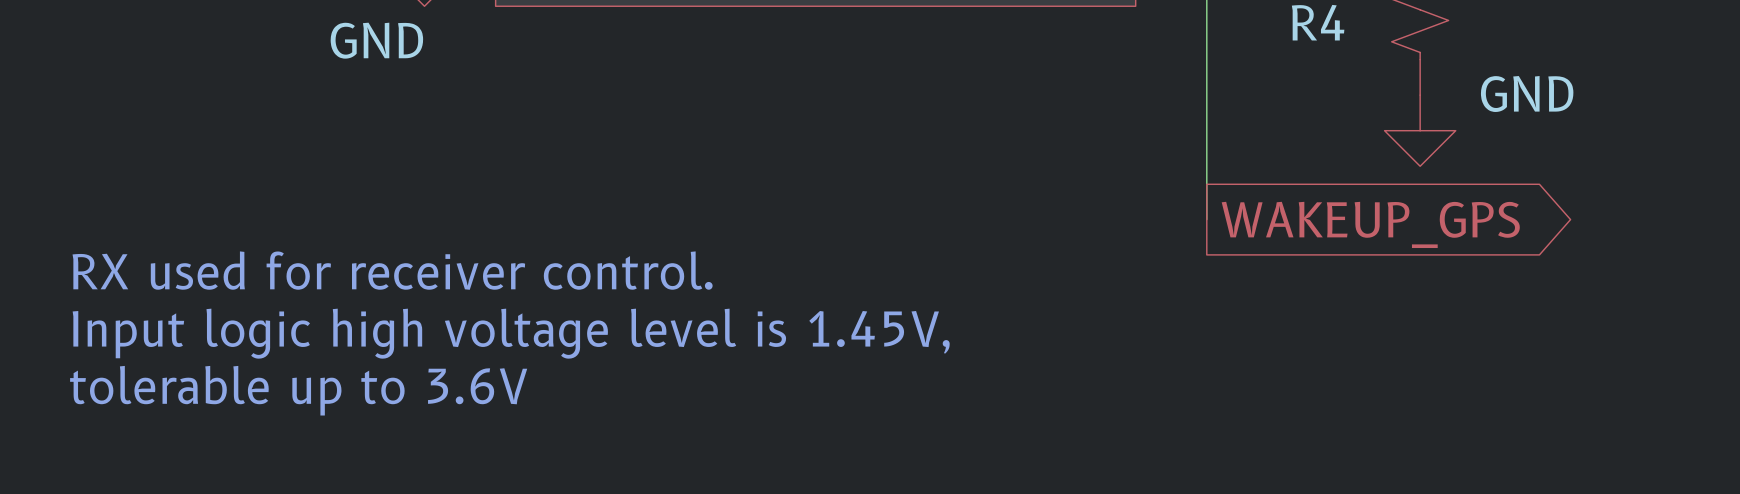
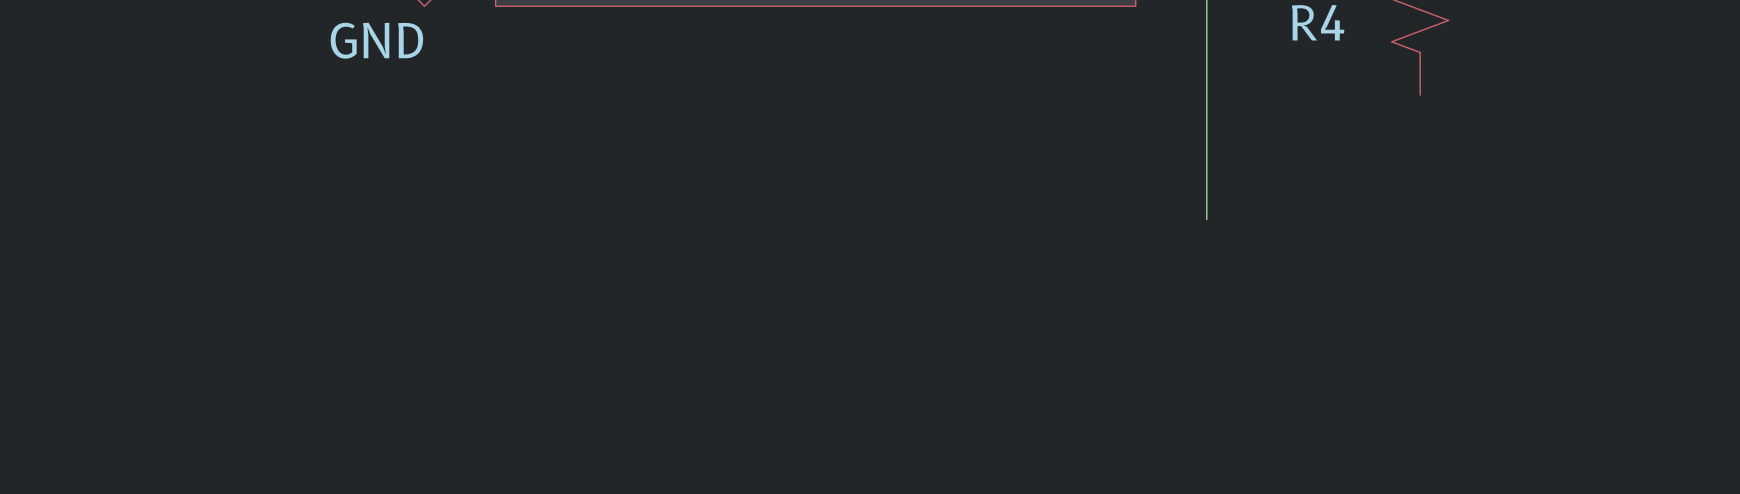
power symbol: GND (1420, 130) -> none
global label: WAKEUP_GPS (1370, 224) -> none
text: RX used for receiver control. (392, 270) -> none
text: Input logic high voltage level is 1.45V, (511, 333) -> none
text: tolerable up to 3.6V (298, 390) -> none

